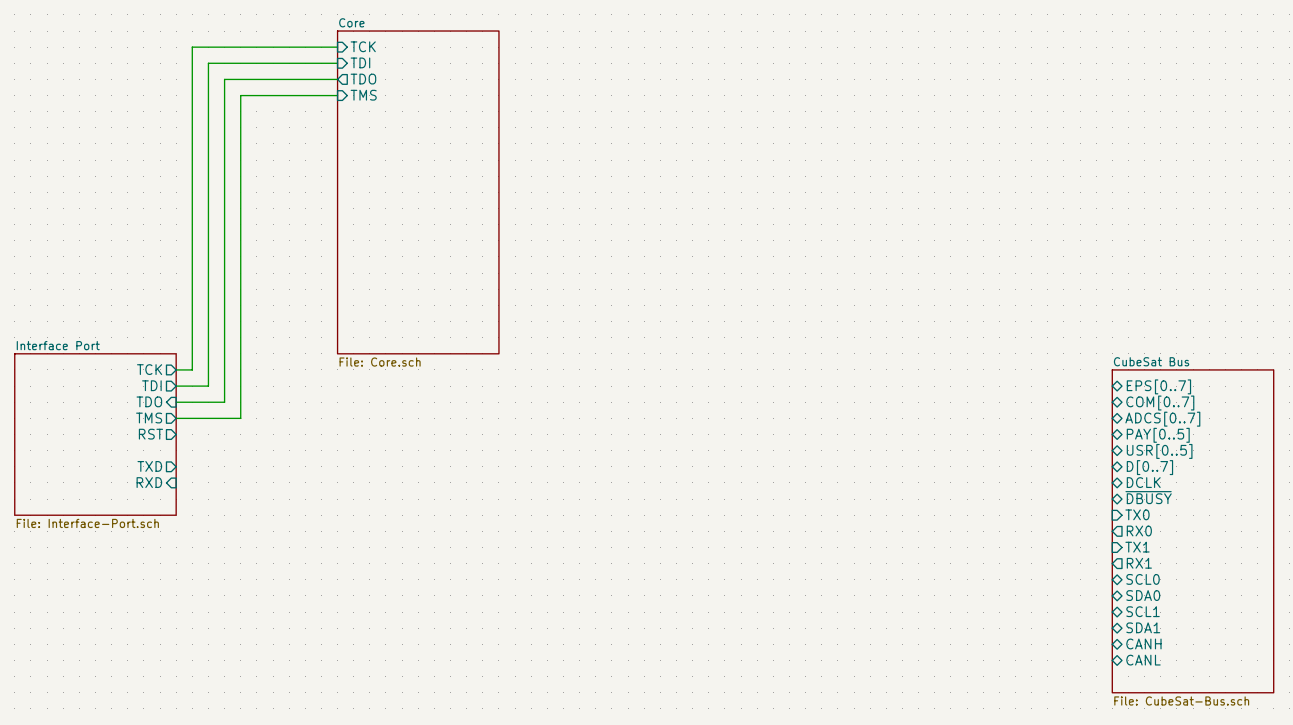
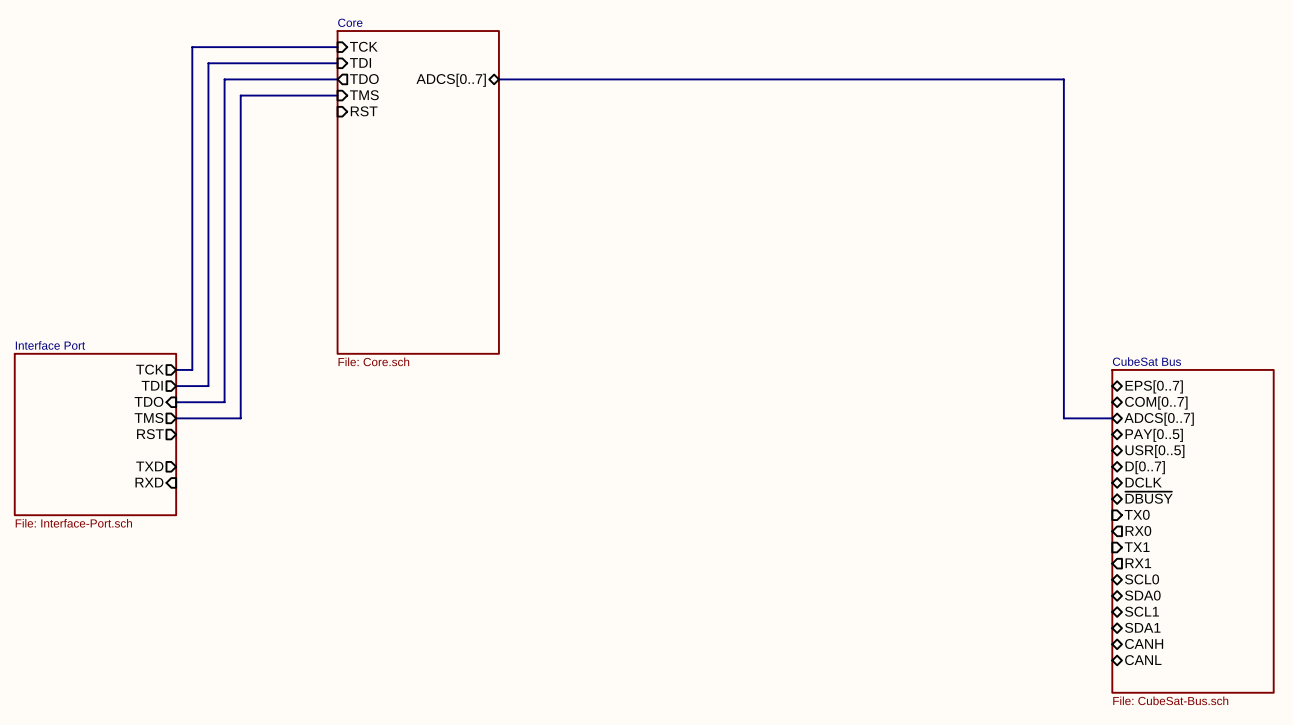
bus: none -> (498, 79) (1063, 79) (1063, 418) (1112, 418)
sheet pin: none -> ADCS[0..7] (451, 80)
sheet pin: none -> RST (364, 111)

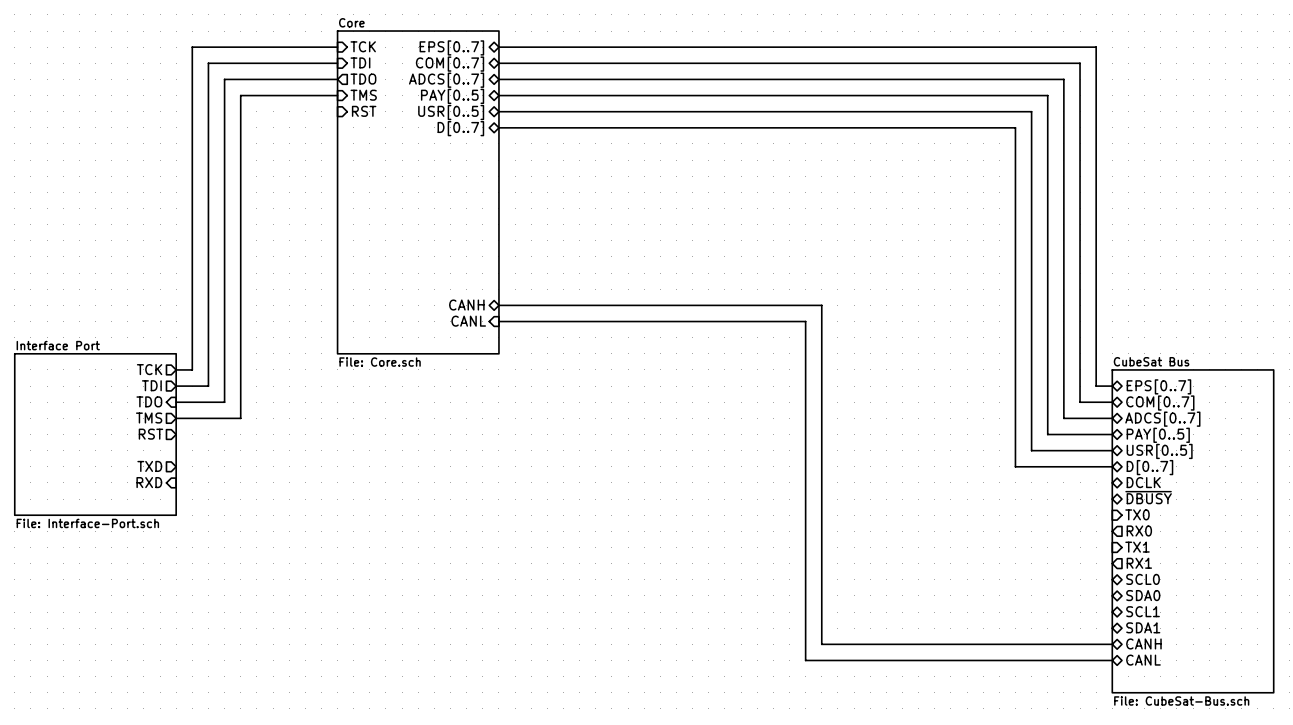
sheet pin: none -> EPS[0..7] (451, 47)
bus: none -> (498, 47) (1096, 47) (1096, 386) (1112, 386)
bus: none -> (498, 63) (1080, 63) (1080, 402) (1112, 402)
sheet pin: none -> COM[0..7] (450, 64)
bus: none -> (498, 95) (1047, 95) (1047, 434) (1112, 434)
sheet pin: none -> PAY[0..5] (452, 96)
bus: none -> (498, 111) (1031, 111) (1031, 450) (1112, 450)
sheet pin: none -> USR[0..5] (451, 112)
bus: none -> (498, 127) (1015, 127) (1015, 466) (1112, 466)
sheet pin: none -> D[0..7] (460, 128)
sheet pin: none -> CANH (466, 305)
wire: none -> (498, 305) (821, 305) (821, 644) (1112, 644)
sheet pin: none -> CANL (468, 321)
wire: none -> (498, 321) (805, 321) (805, 660) (1112, 660)

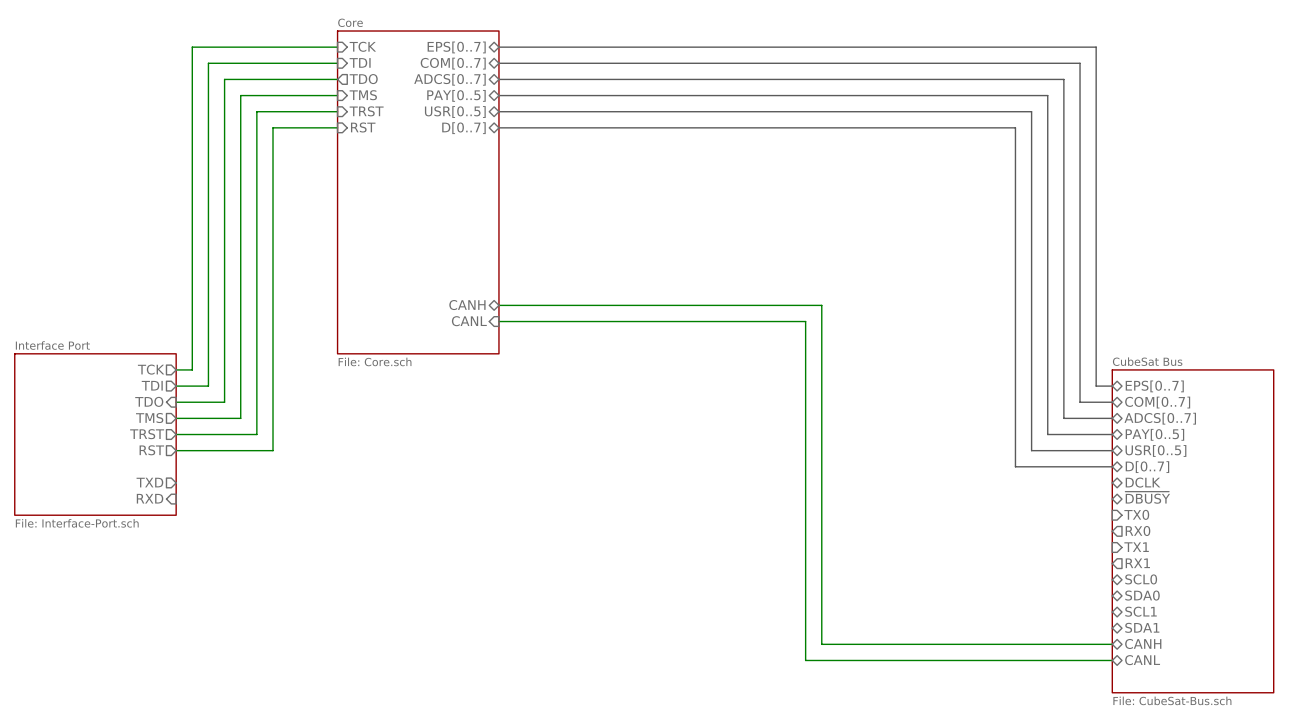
wire: none -> (337, 111) (256, 111) (256, 434) (176, 434)
sheet pin: RST (364, 111) -> TRST (366, 111)
wire: none -> (337, 127) (273, 127) (273, 450) (176, 450)
sheet pin: none -> RST (363, 127)
sheet pin: RST (150, 434) -> TRST (147, 434)
sheet pin: none -> RST (151, 450)
sheet pin: TXD (149, 466) -> none
sheet pin shape: input (149, 482) -> output (149, 482)
sheet pin: RXD (149, 482) -> TXD (149, 482)
sheet pin: none -> RXD (150, 498)

